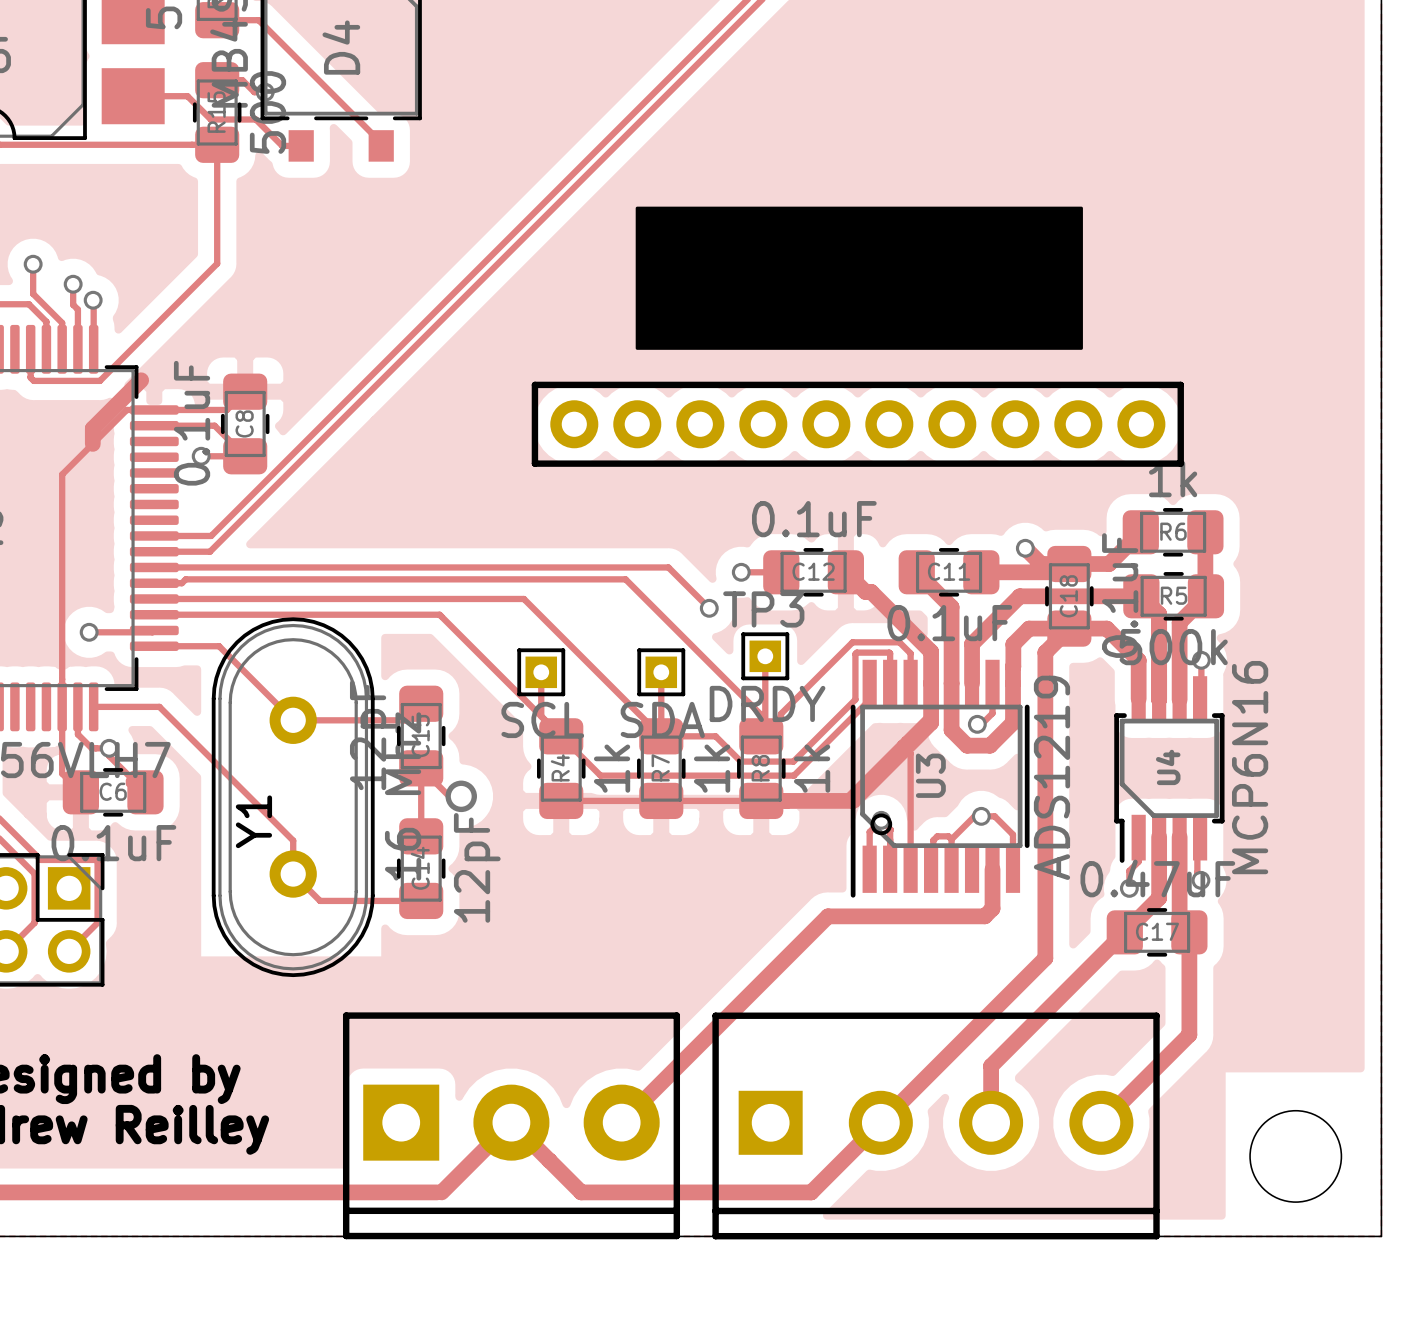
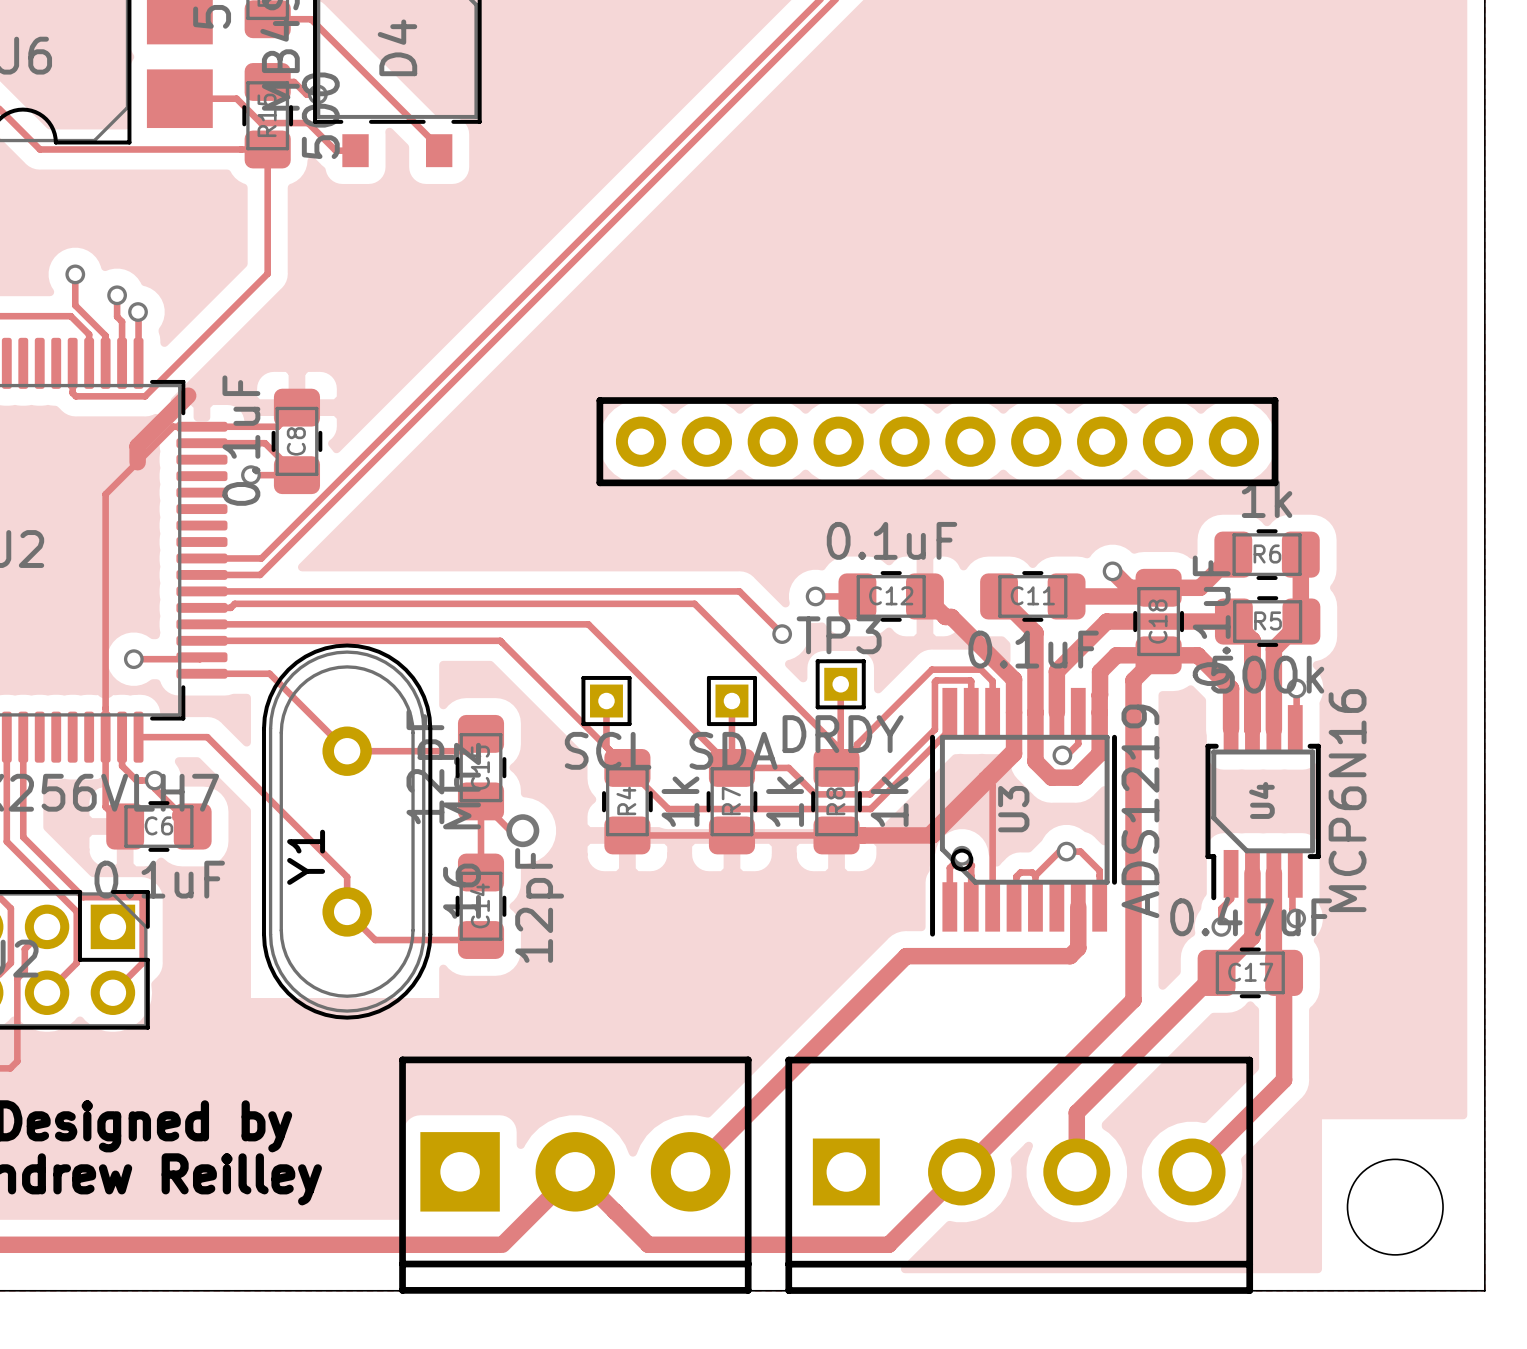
drawing: [635, 206, 1083, 350] -> none

